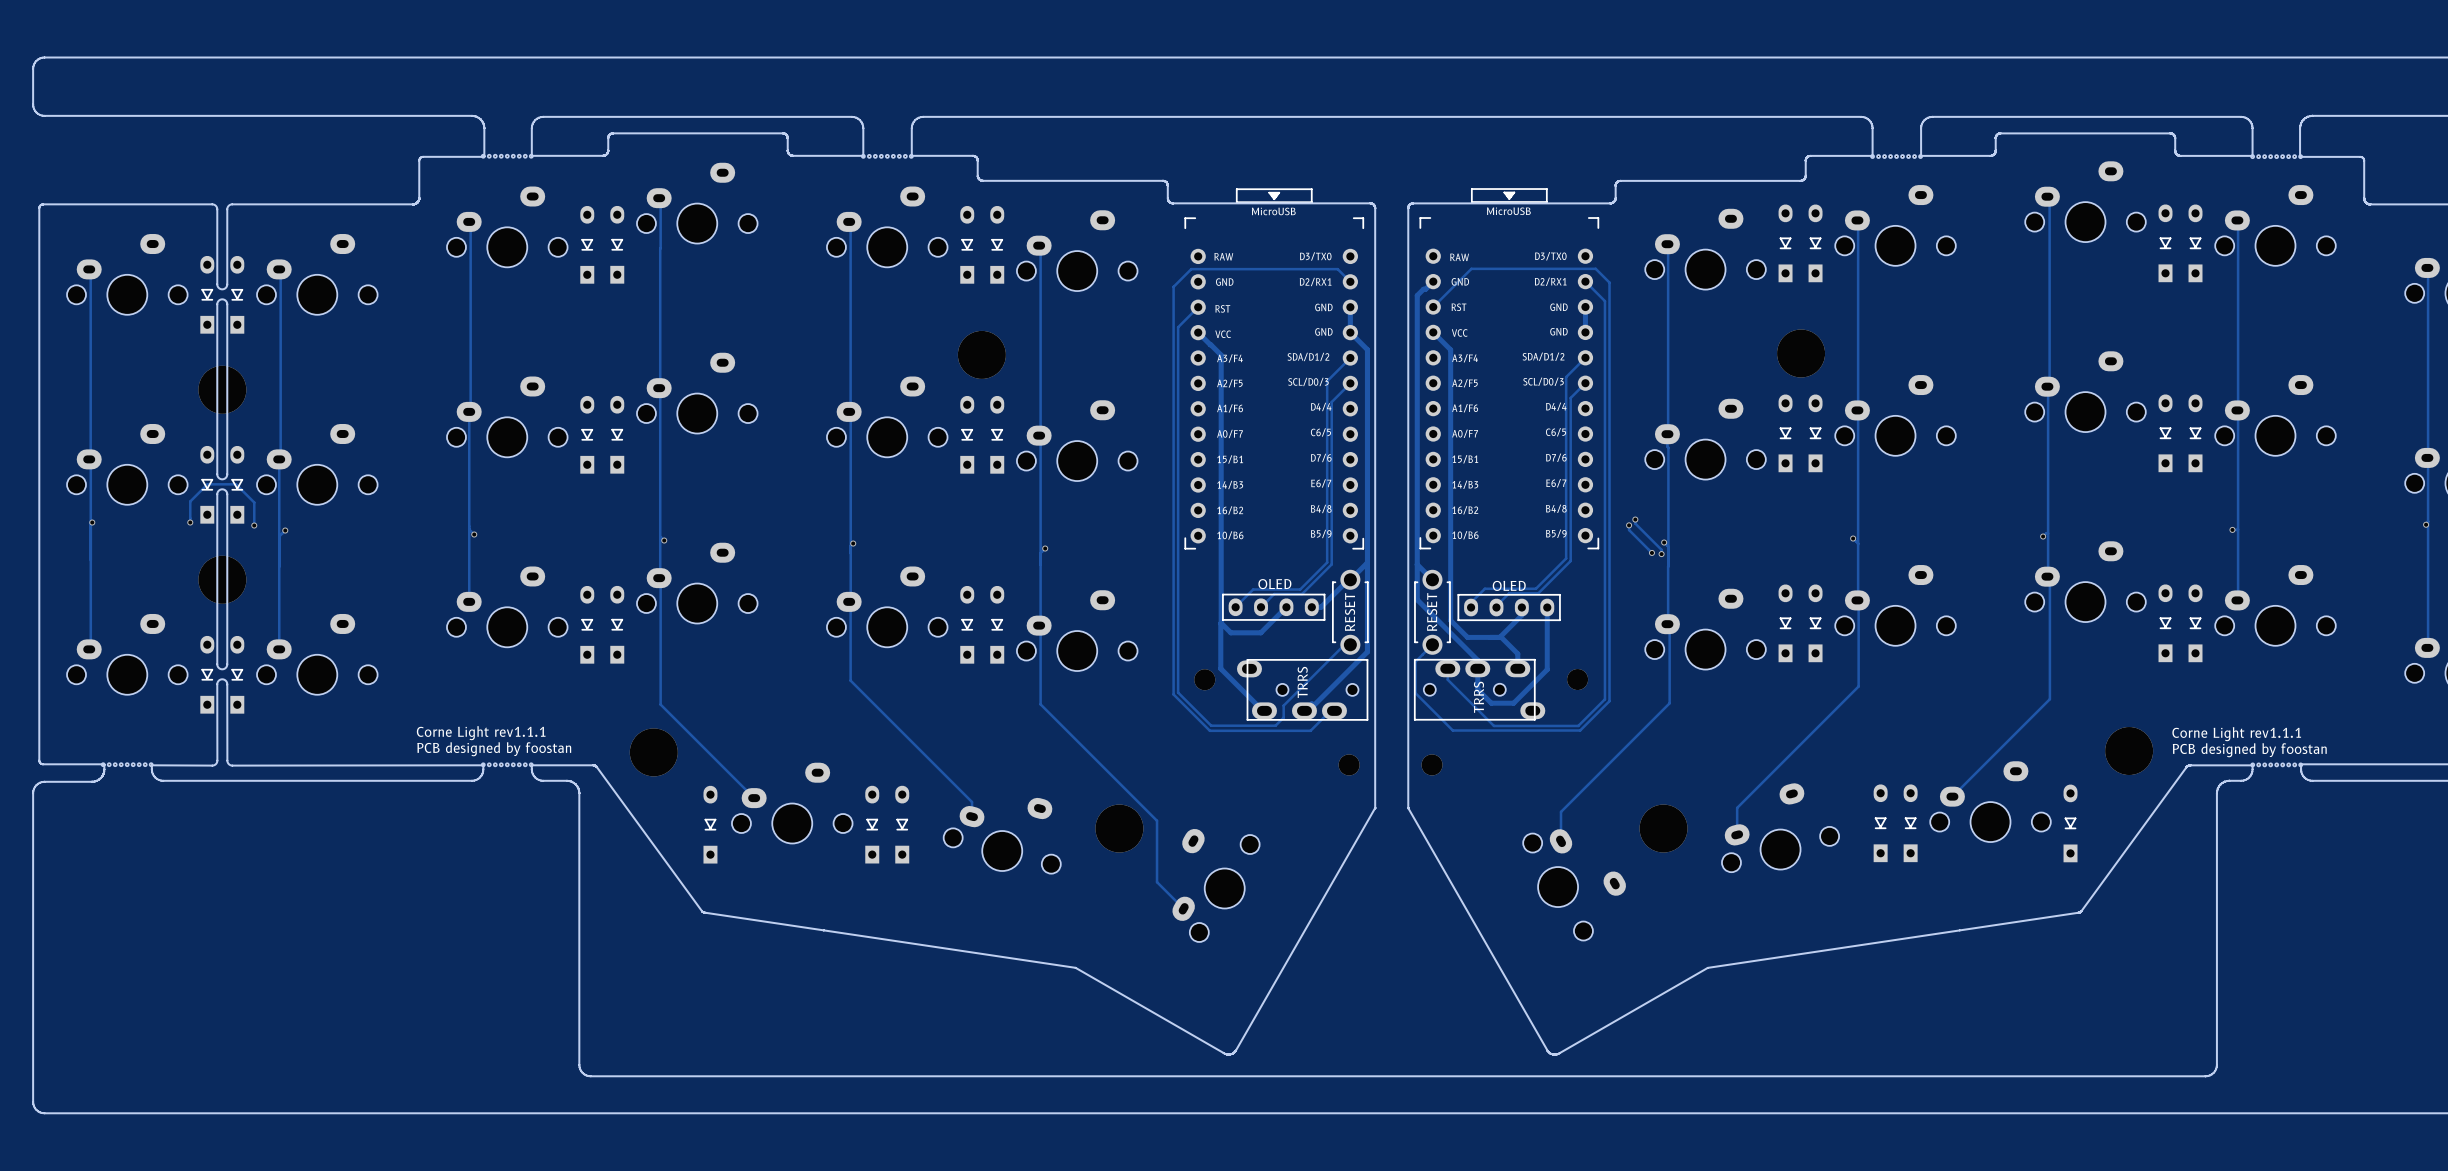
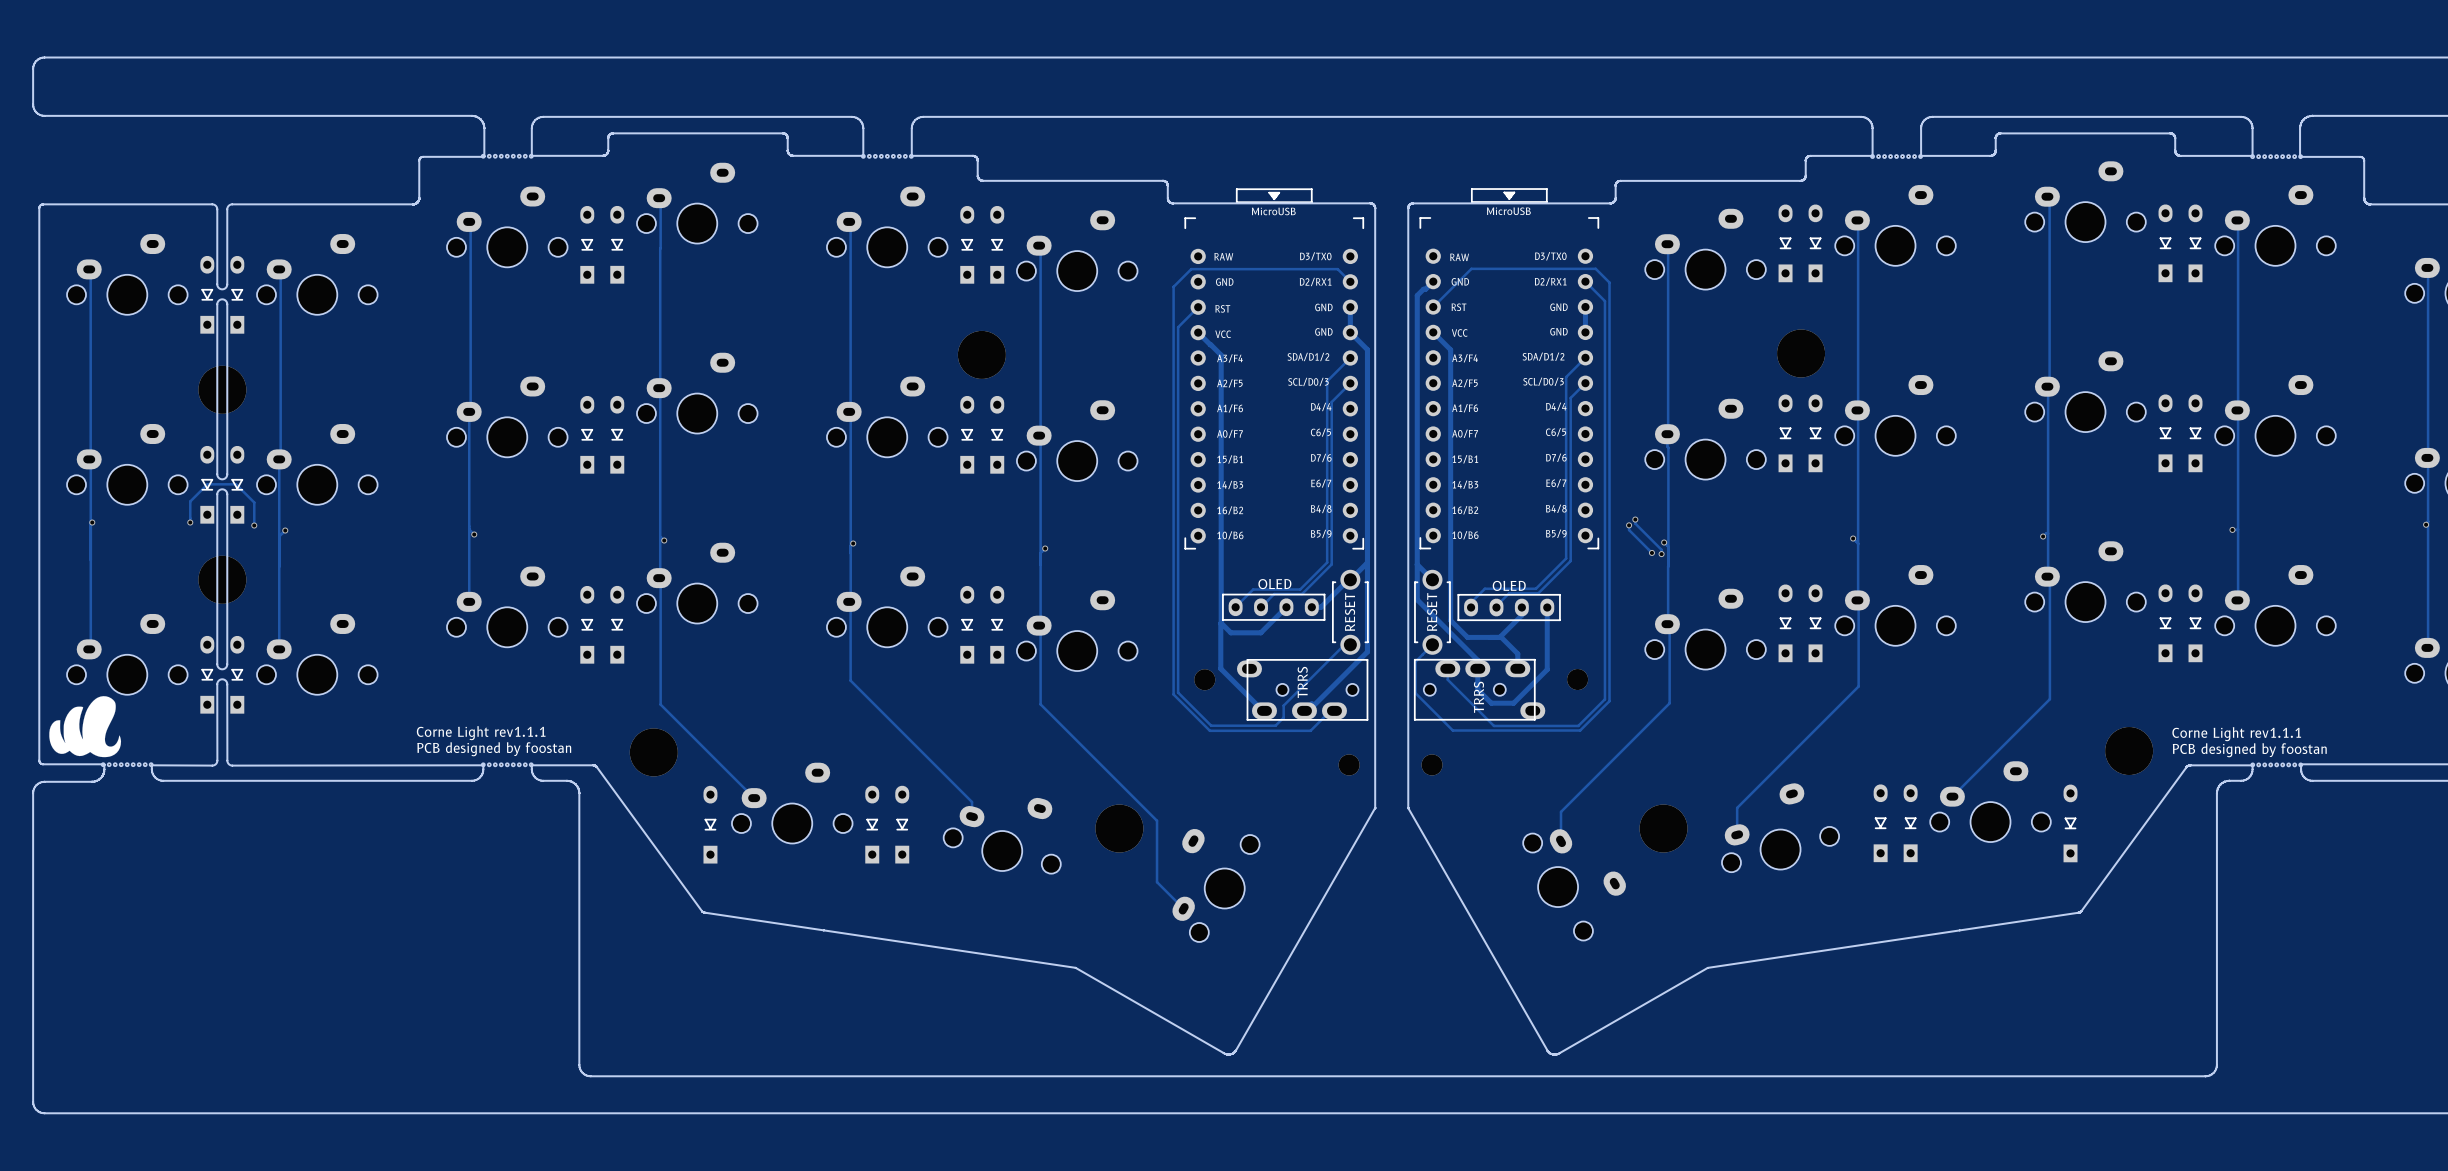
drawing: none -> [49, 696, 122, 758]

